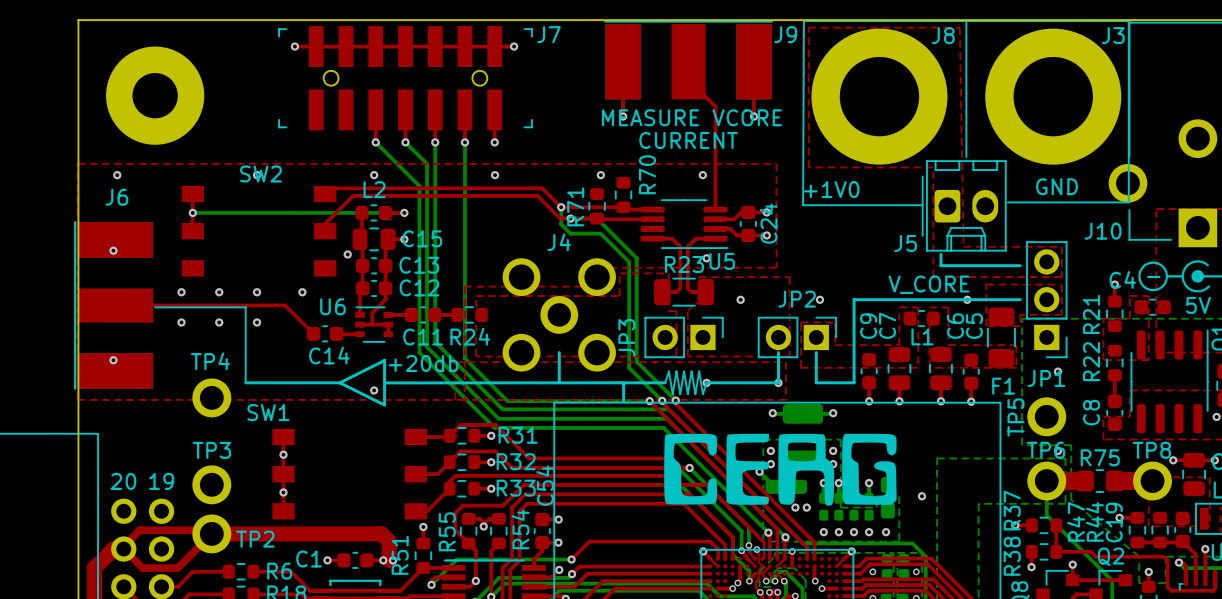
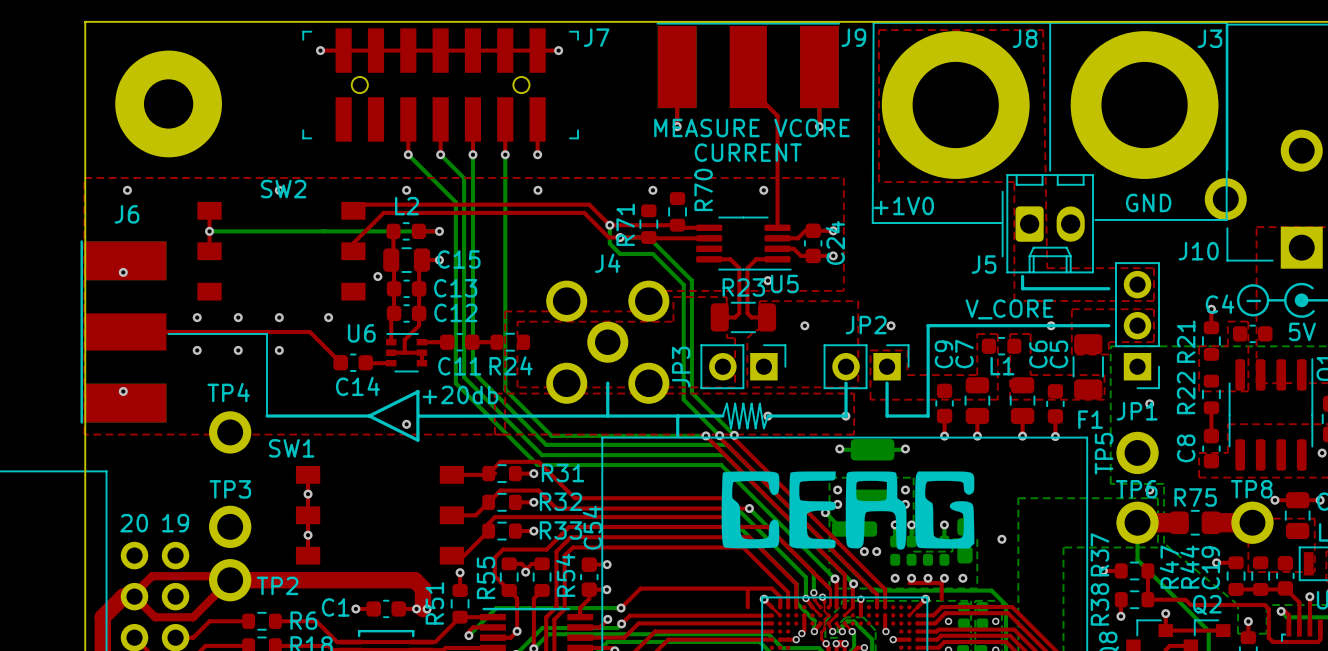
top track: none -> (909, 583) (941, 583) (941, 599)
top track: none -> (747, 591) (747, 607)

